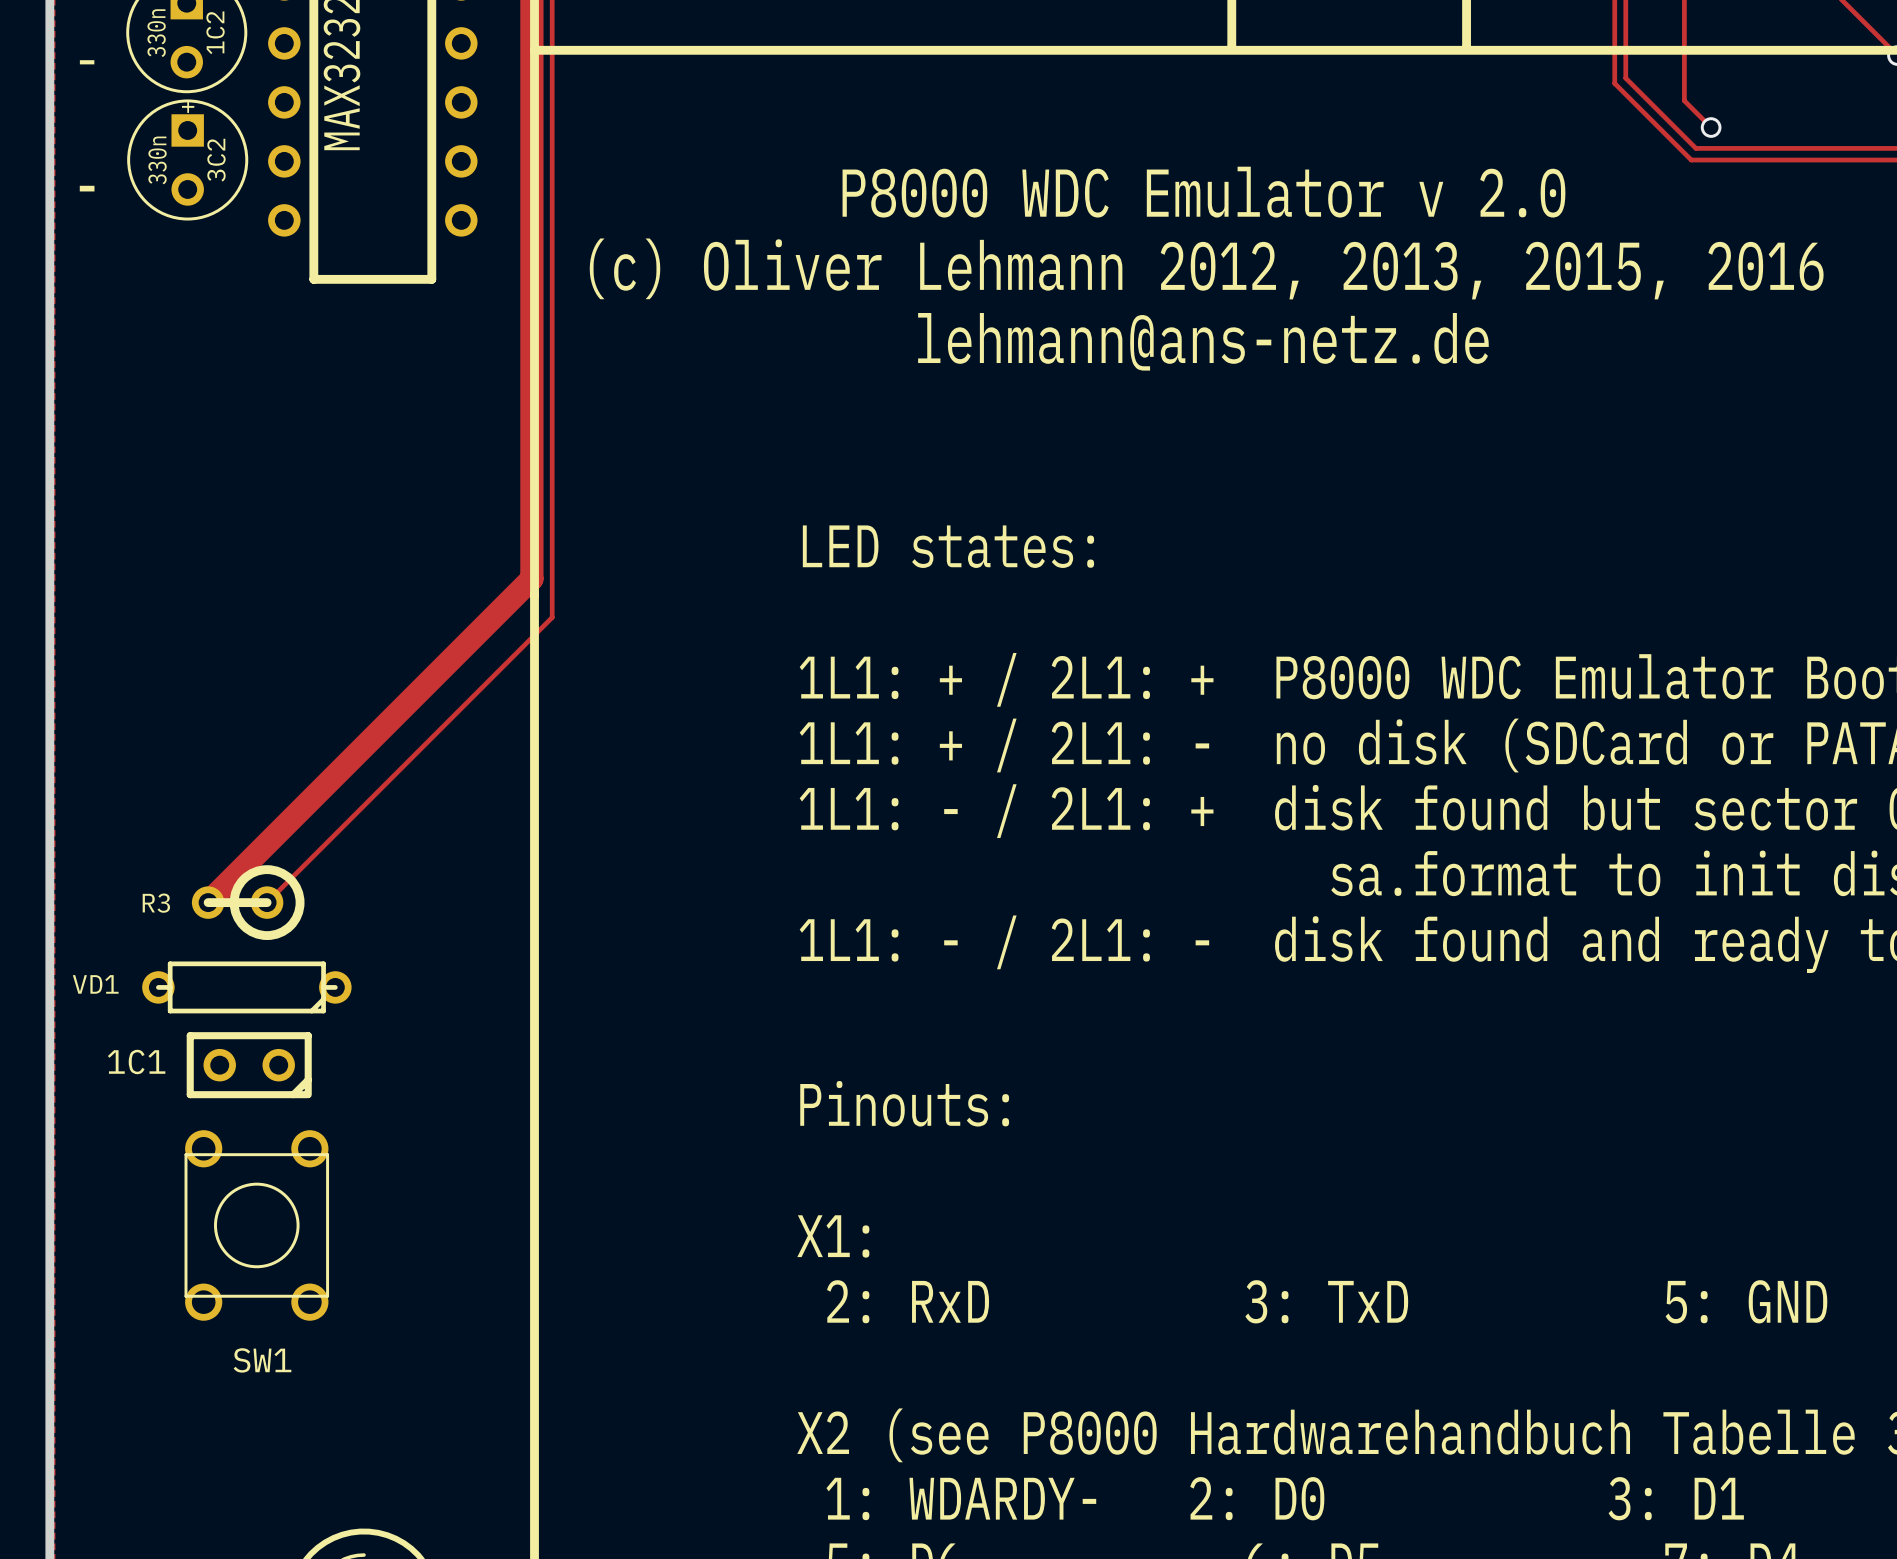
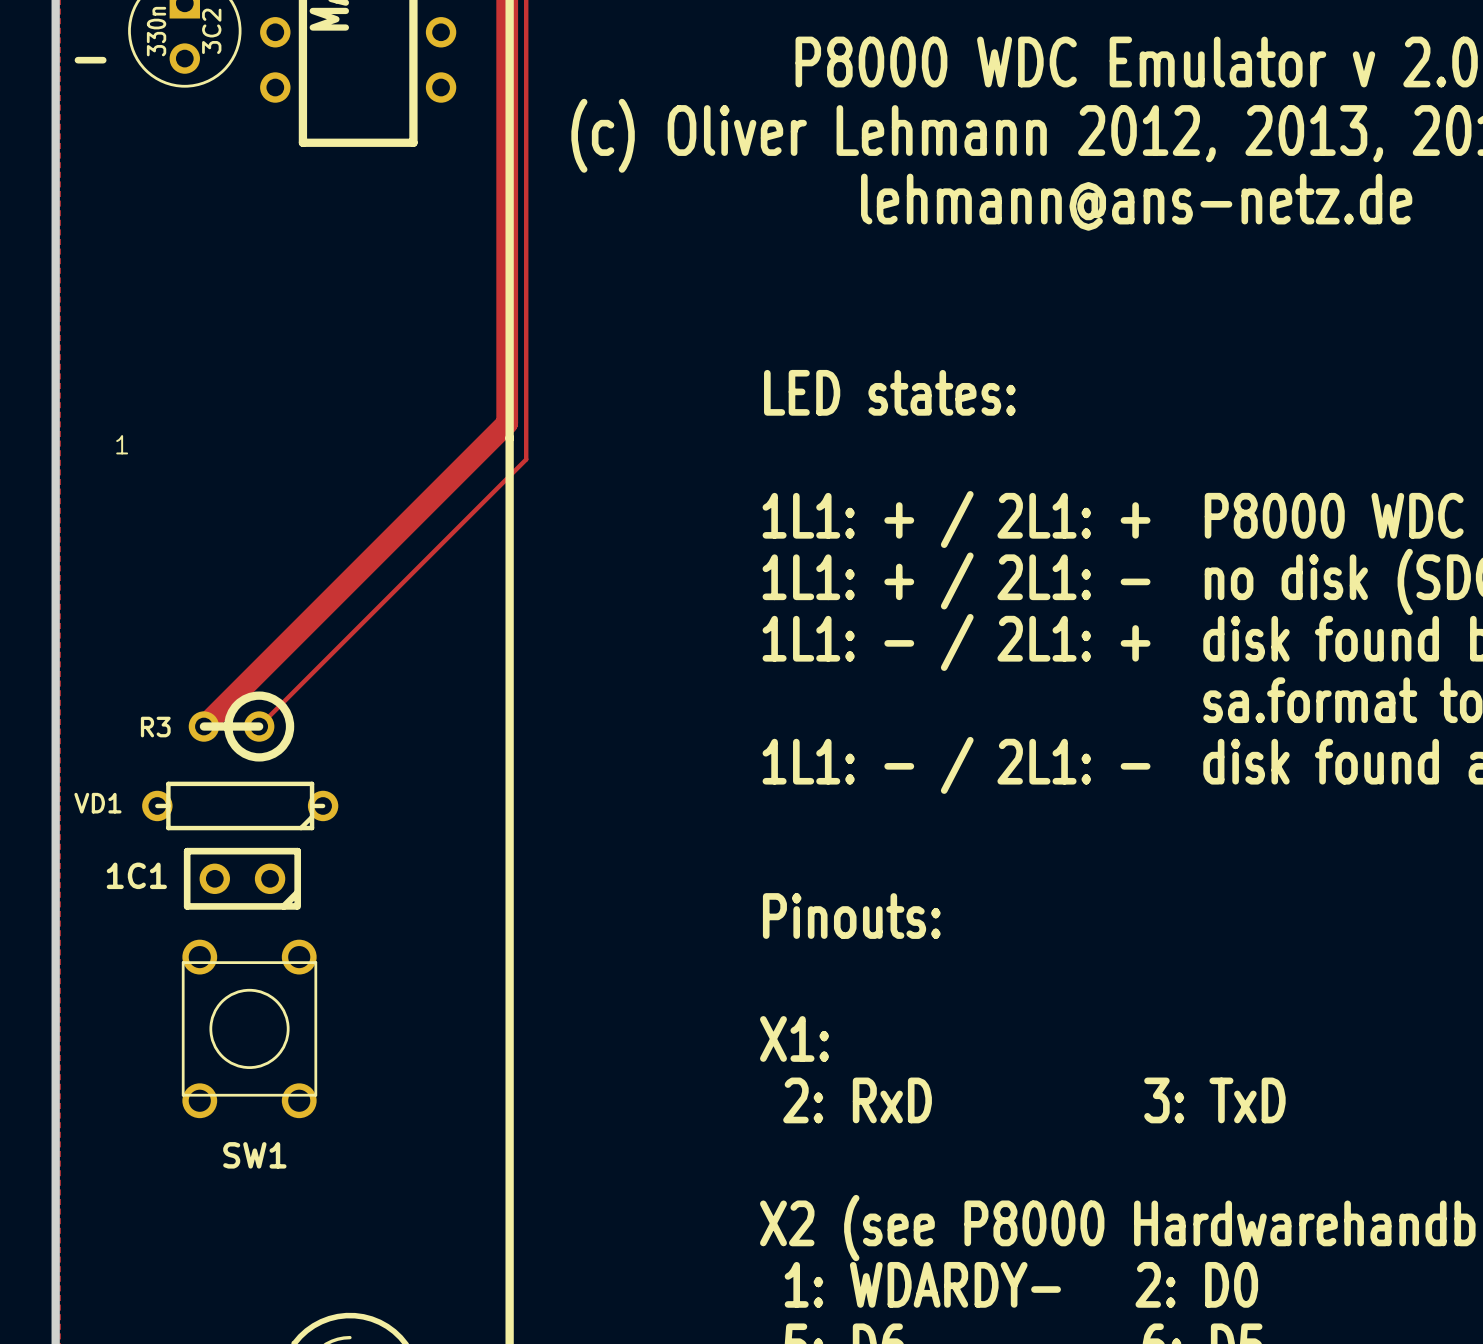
text: none -> 1 (122, 444)

